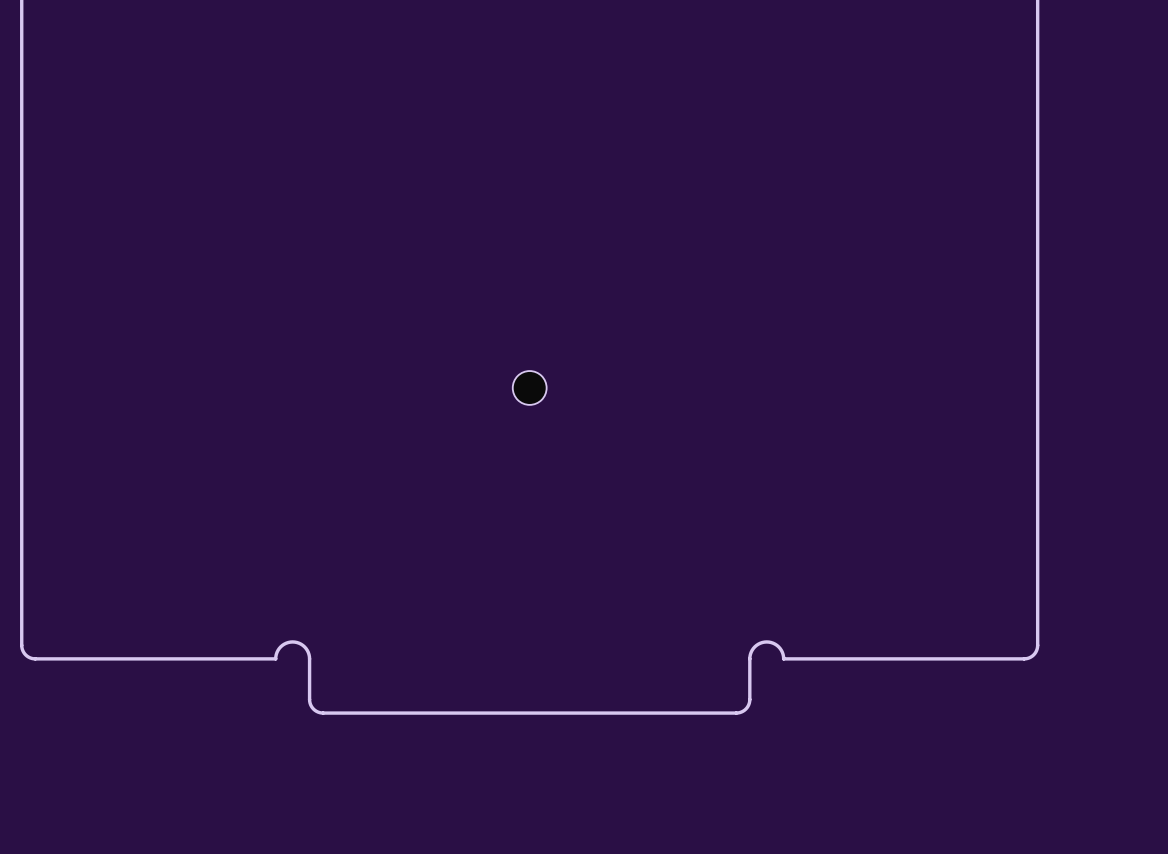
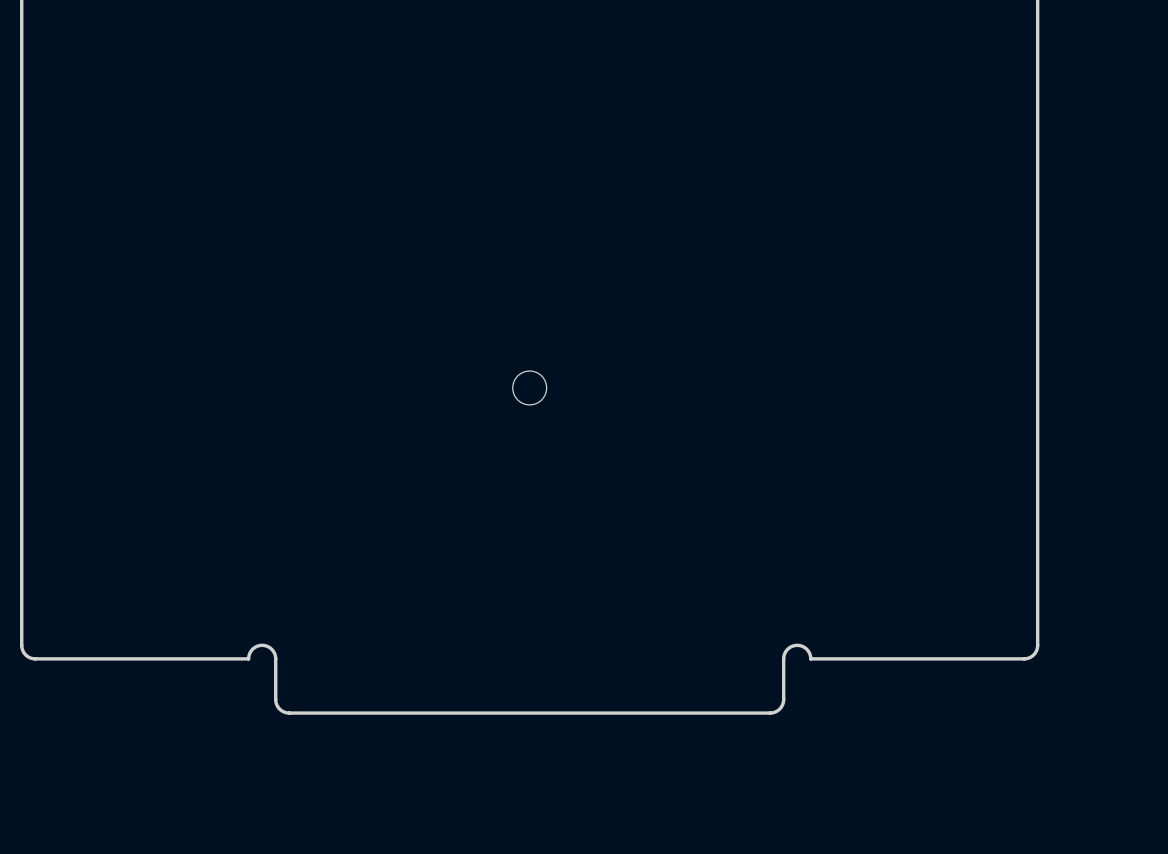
board edge: (248, 658) (275, 658) (277, 650) (284, 644) (294, 642) (302, 645) (309, 656) (310, 703) (314, 710) (323, 713) -> (248, 658) (251, 650) (258, 645) (267, 646) (273, 652) (275, 658) (275, 701) (281, 710) (287, 712) (323, 713)
board edge: (810, 658) (783, 658) (781, 650) (775, 644) (764, 642) (756, 645) (749, 656) (749, 703) (744, 710) (736, 713) -> (810, 658) (807, 650) (800, 645) (792, 646) (785, 652) (783, 658) (783, 701) (778, 710) (771, 712) (736, 713)

